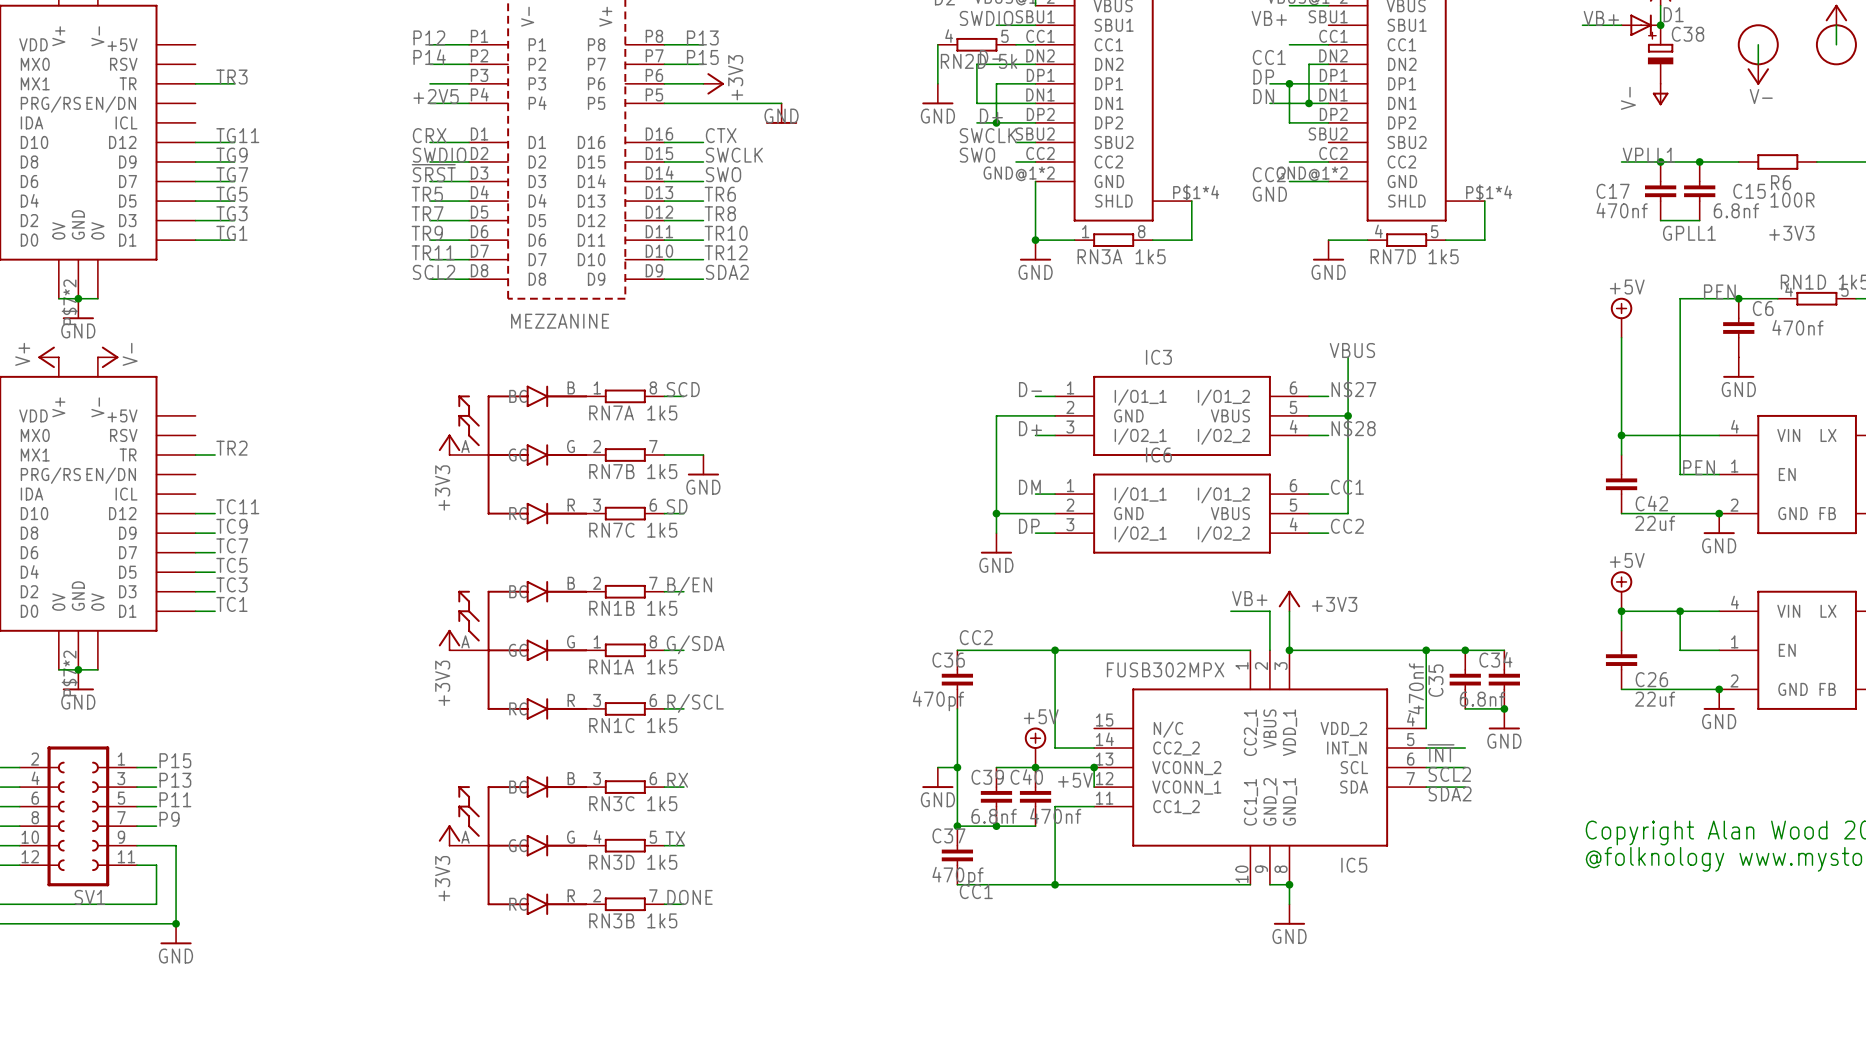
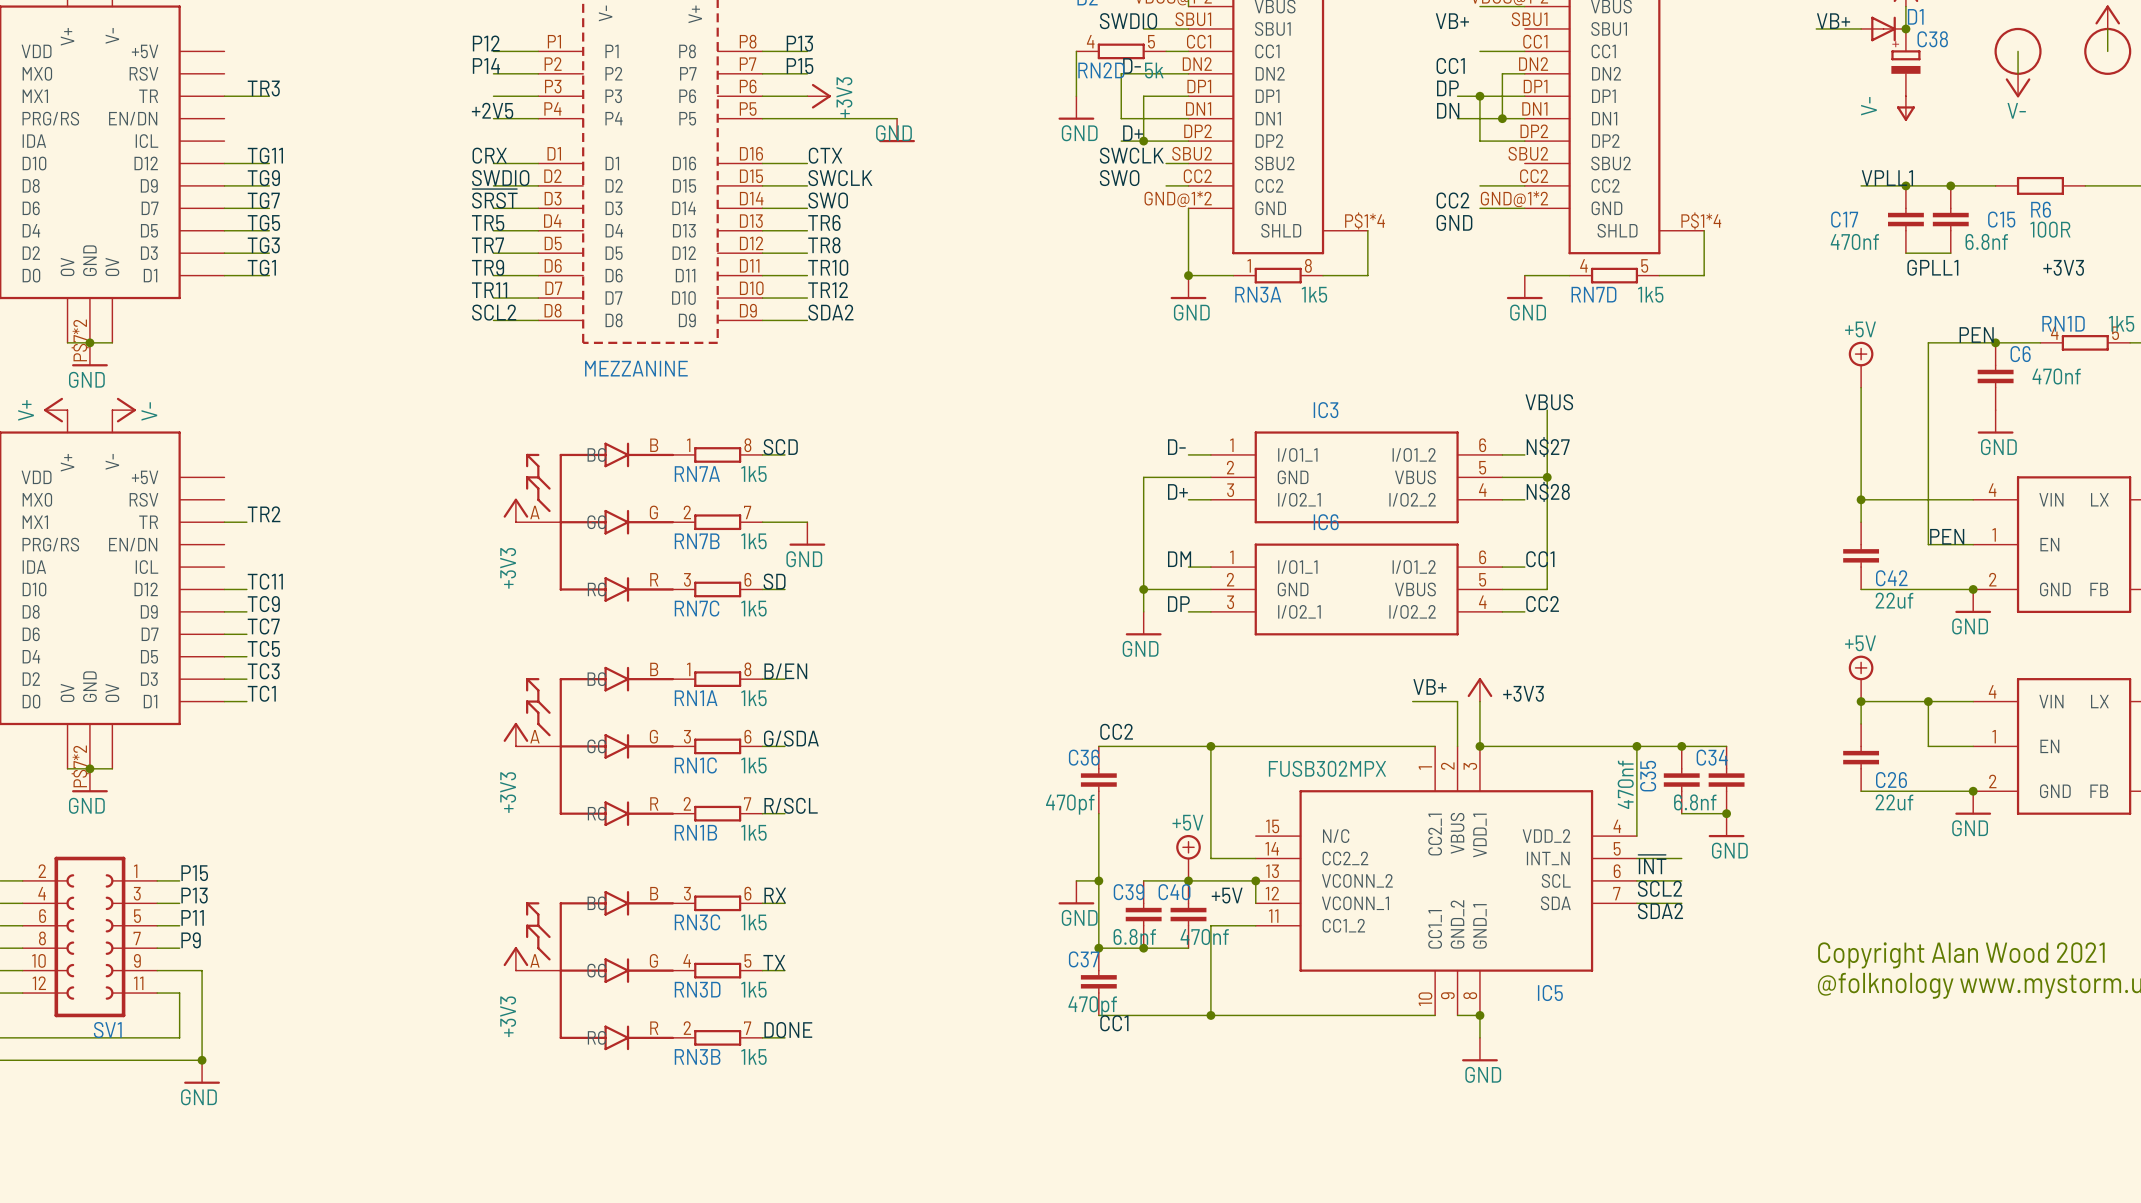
RN1B position: (625, 591) -> (717, 813)
RN1A position: (625, 650) -> (717, 679)
RN1C position: (625, 708) -> (717, 746)

